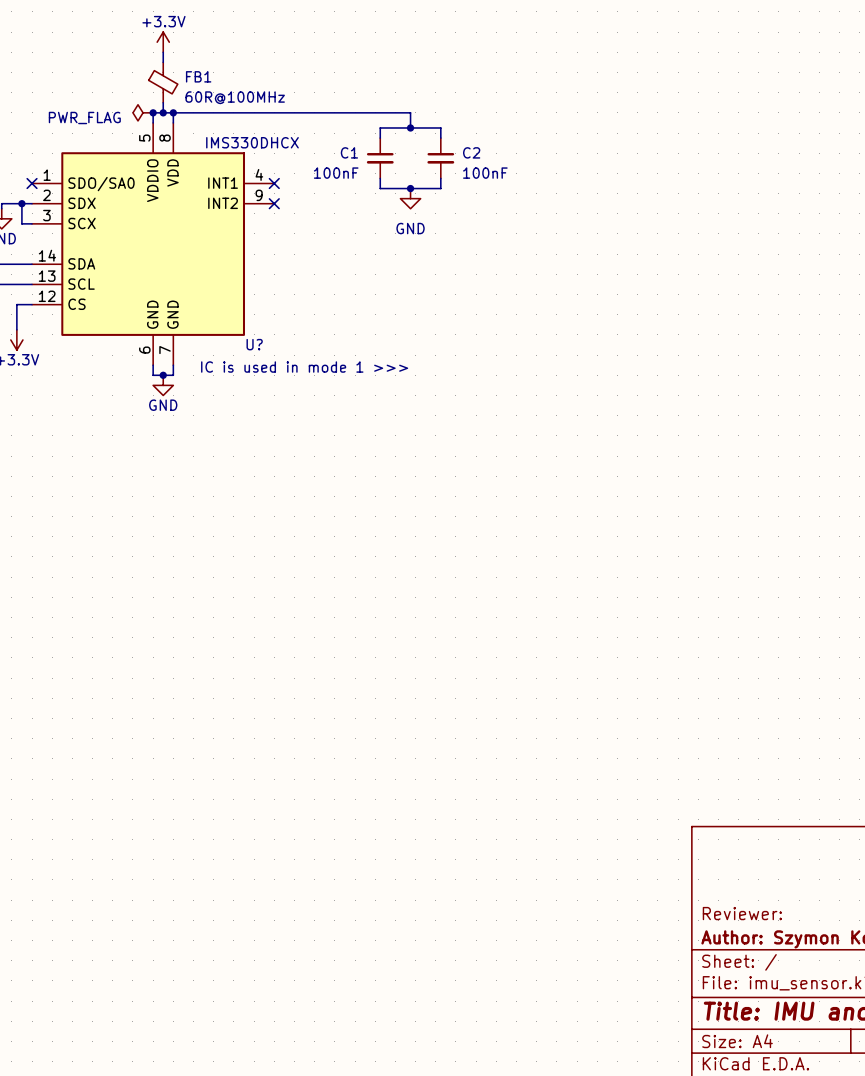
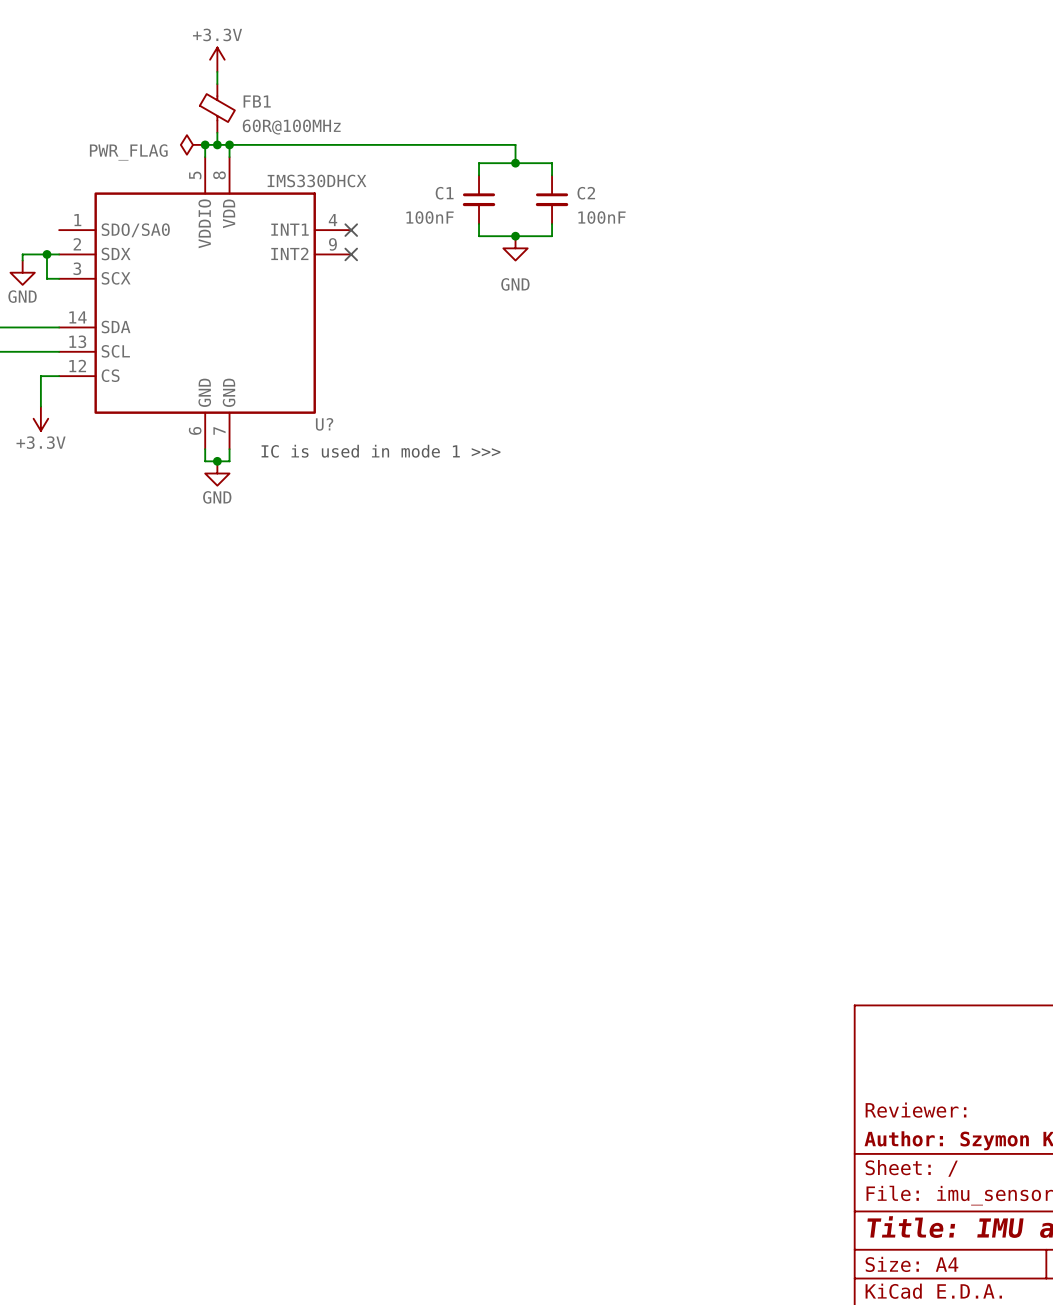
no-connect mark: (32, 183) -> none

